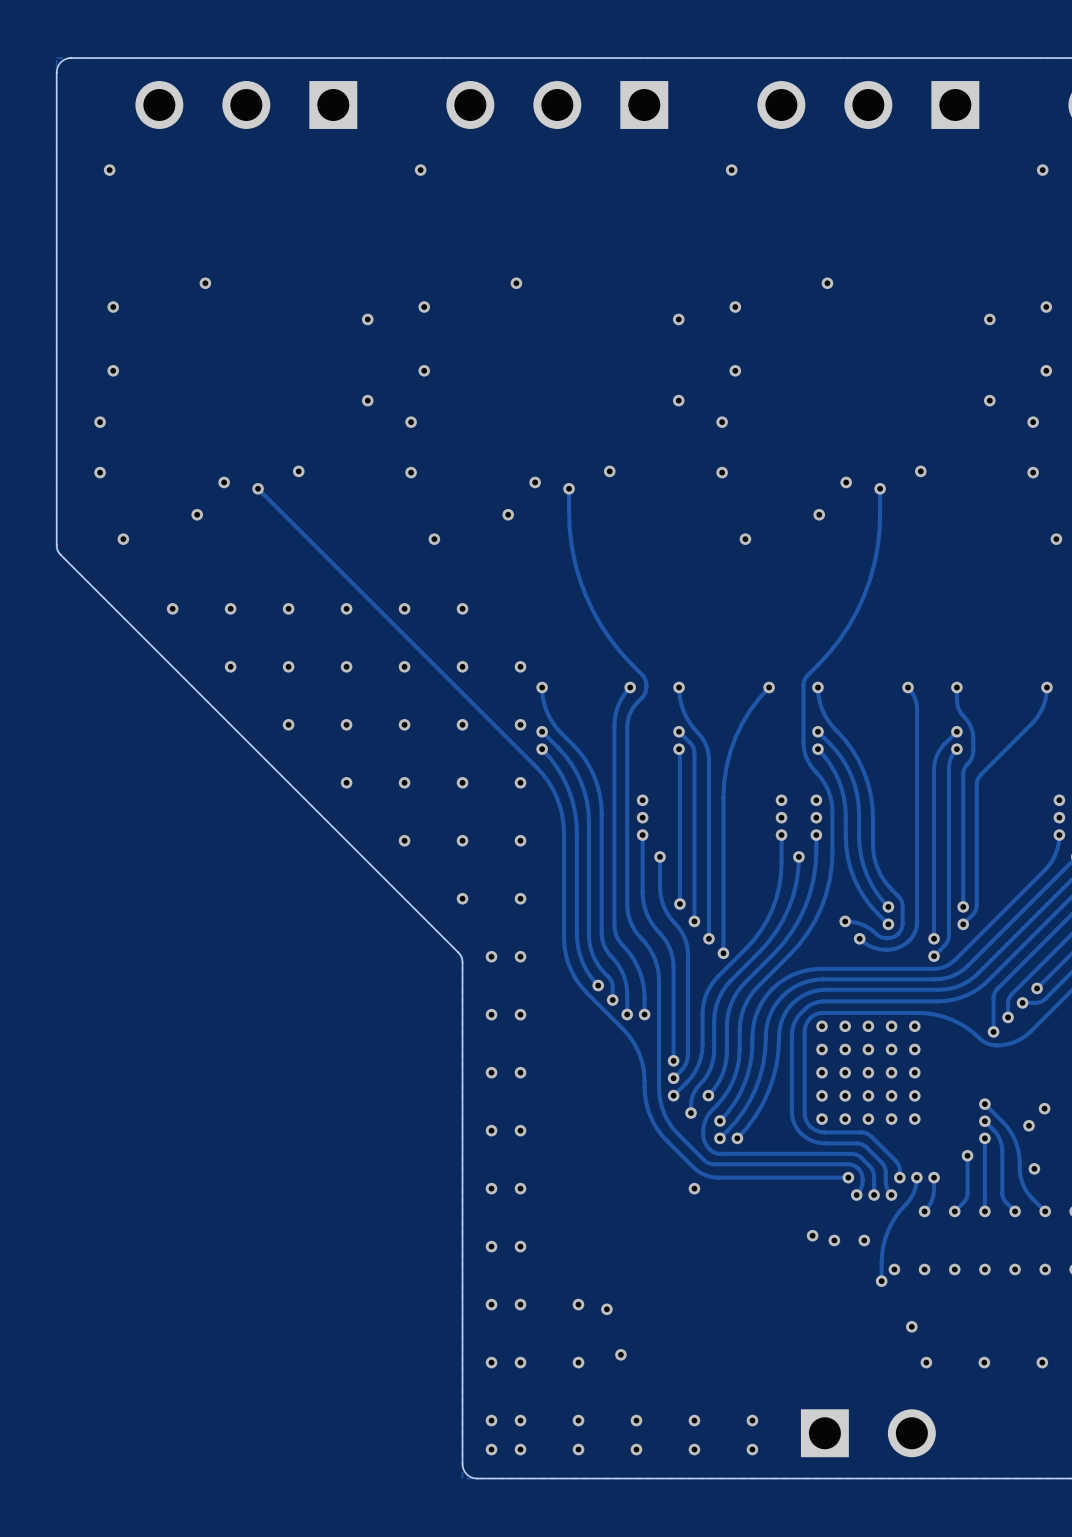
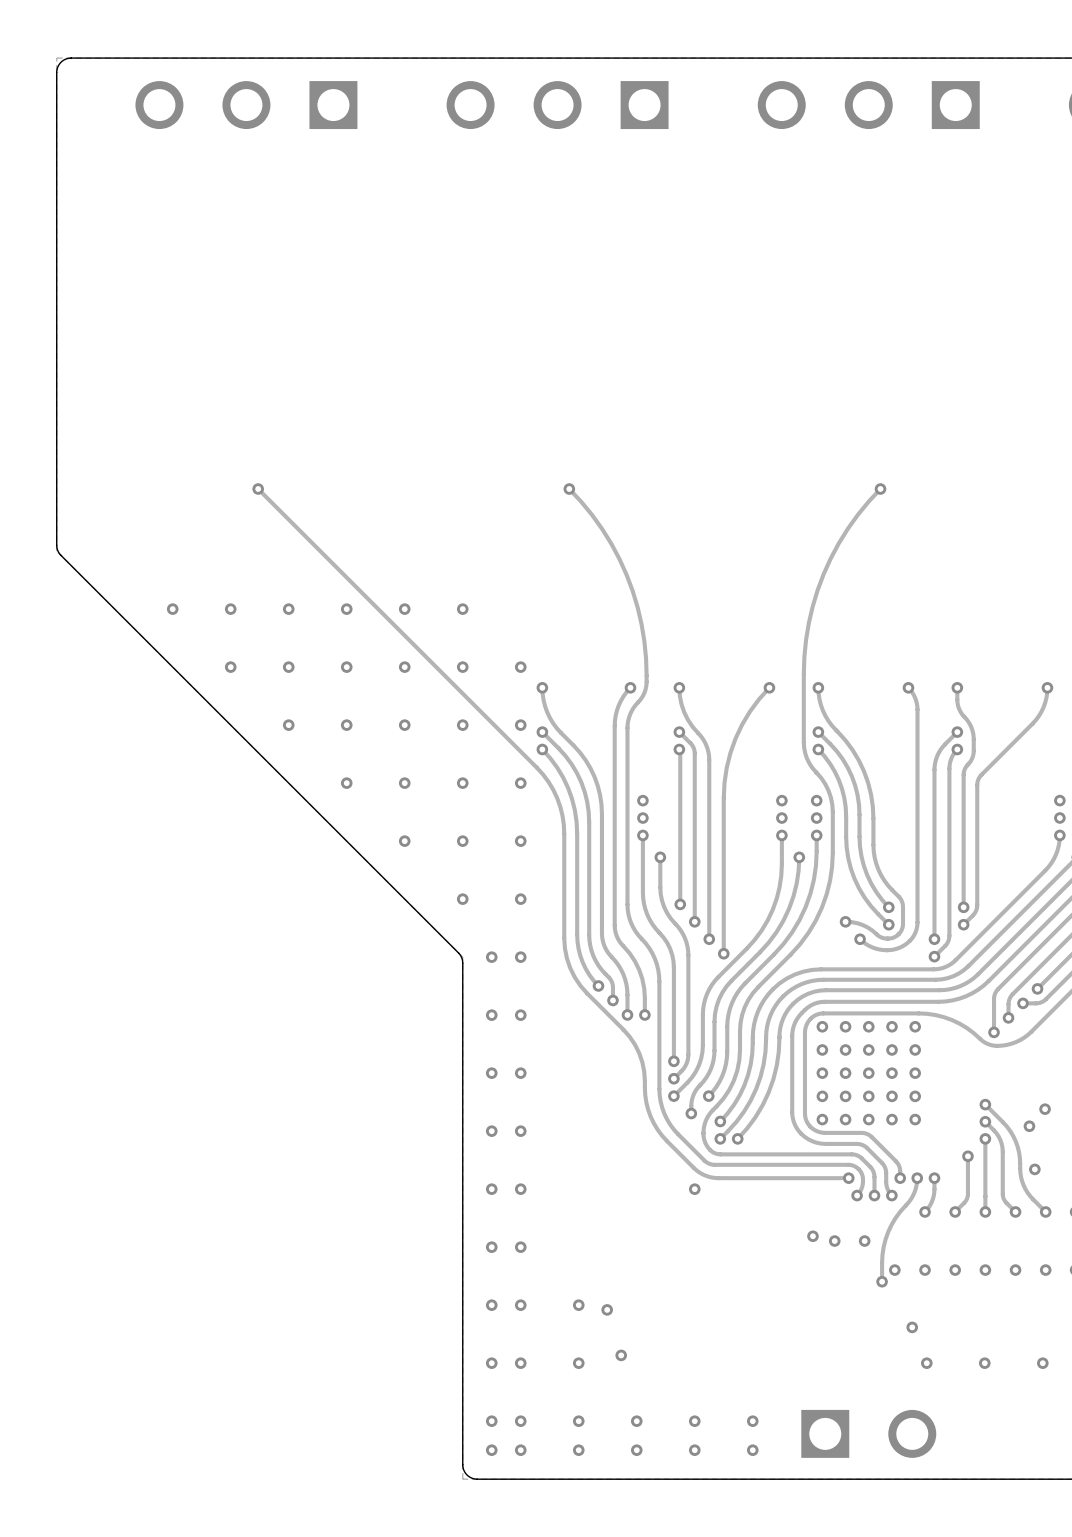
via: (109, 170) -> none
via: (420, 170) -> none
via: (731, 170) -> none
via: (1042, 170) -> none
via: (205, 283) -> none
via: (516, 283) -> none
via: (827, 283) -> none
via: (113, 307) -> none
via: (424, 307) -> none
via: (735, 307) -> none
via: (1046, 307) -> none
via: (367, 319) -> none
via: (678, 319) -> none
via: (989, 319) -> none
via: (113, 370) -> none
via: (424, 370) -> none
via: (735, 370) -> none
via: (1046, 370) -> none
via: (367, 400) -> none
via: (678, 400) -> none
via: (989, 400) -> none
via: (100, 422) -> none
via: (411, 422) -> none
via: (722, 422) -> none
via: (1033, 422) -> none
via: (298, 471) -> none
via: (609, 471) -> none
via: (920, 471) -> none
via: (100, 472) -> none
via: (411, 472) -> none
via: (722, 472) -> none
via: (1033, 472) -> none
via: (224, 482) -> none
via: (535, 482) -> none
via: (846, 482) -> none
track: (569, 488) (569, 529) (579, 578) (600, 625) (620, 652) (644, 678) (645, 691) (637, 701) -> (569, 489) (592, 514) (611, 543) (632, 590) (641, 624) (646, 658) (646, 687) (638, 702)
track: (880, 488) (877, 548) (863, 596) (839, 639) (806, 676) (803, 685) -> (880, 489) (847, 528) (823, 573) (808, 623) (804, 657) (803, 685)
via: (197, 514) -> none
via: (508, 514) -> none
via: (819, 514) -> none
via: (123, 539) -> none
via: (434, 539) -> none
via: (745, 539) -> none
via: (1056, 539) -> none

